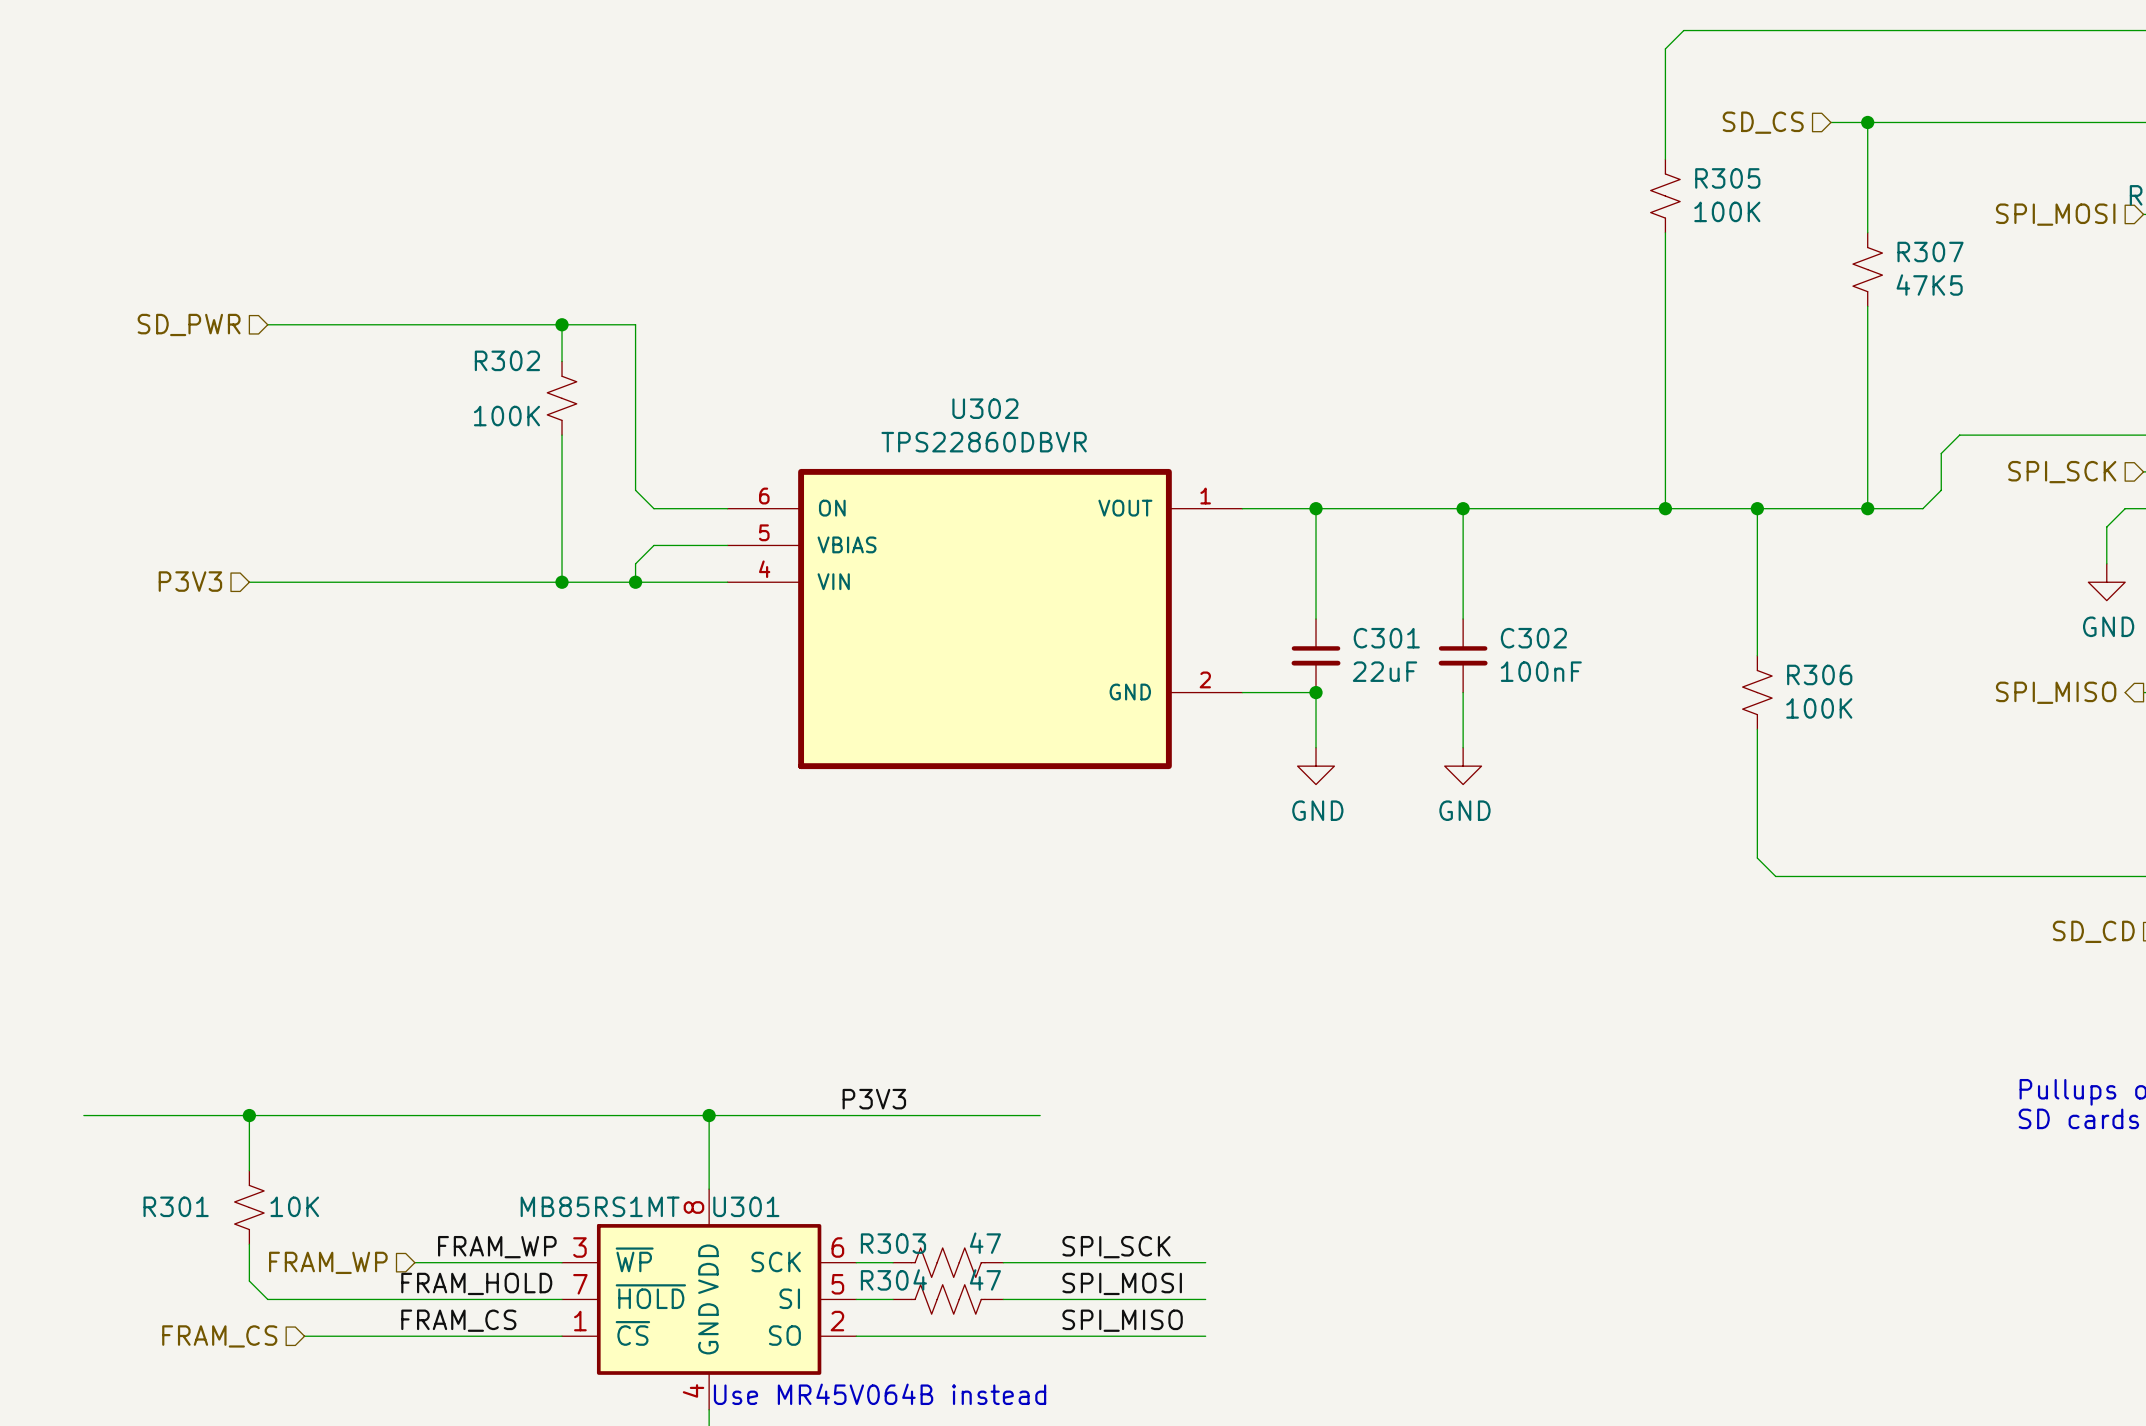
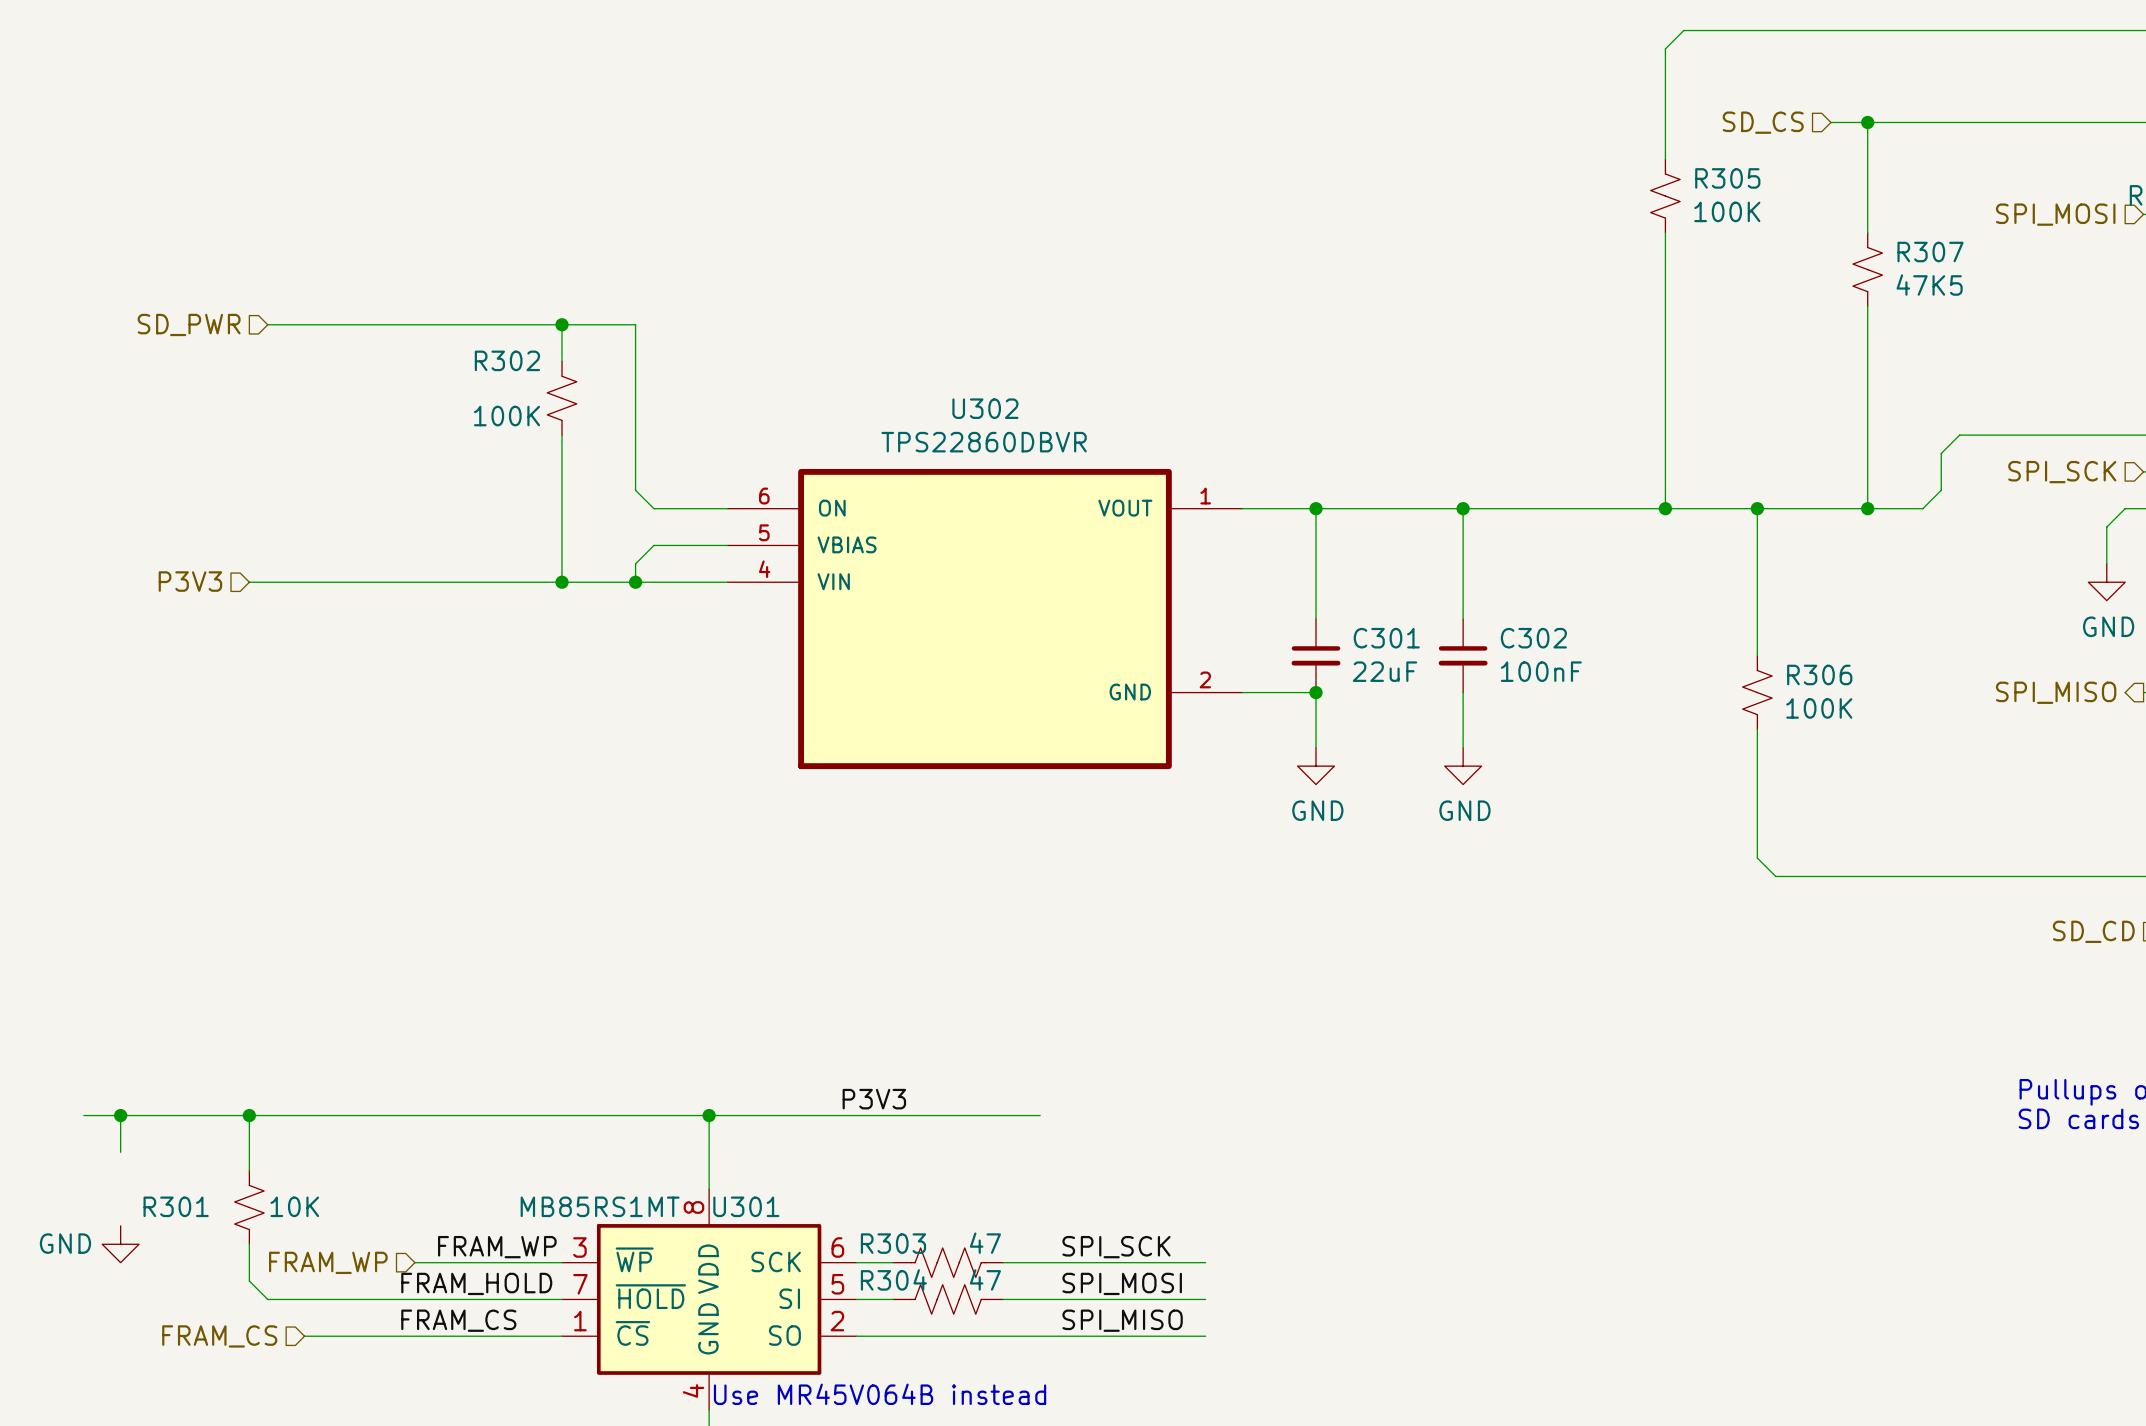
wire: none -> (120, 1115) (120, 1152)
junction: none -> (120, 1115)
power symbol: none -> GND (120, 1244)

